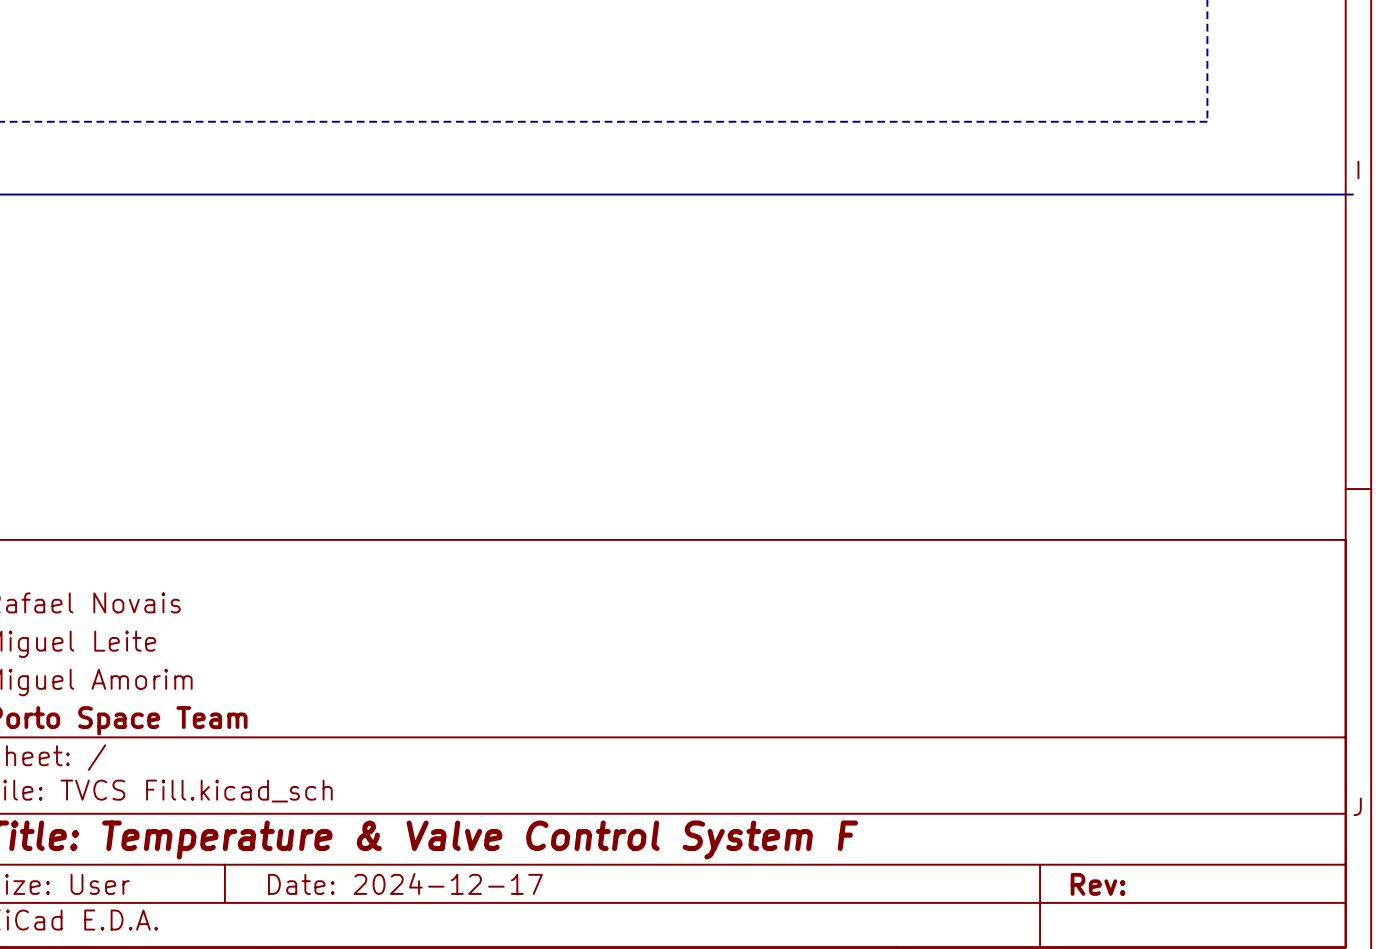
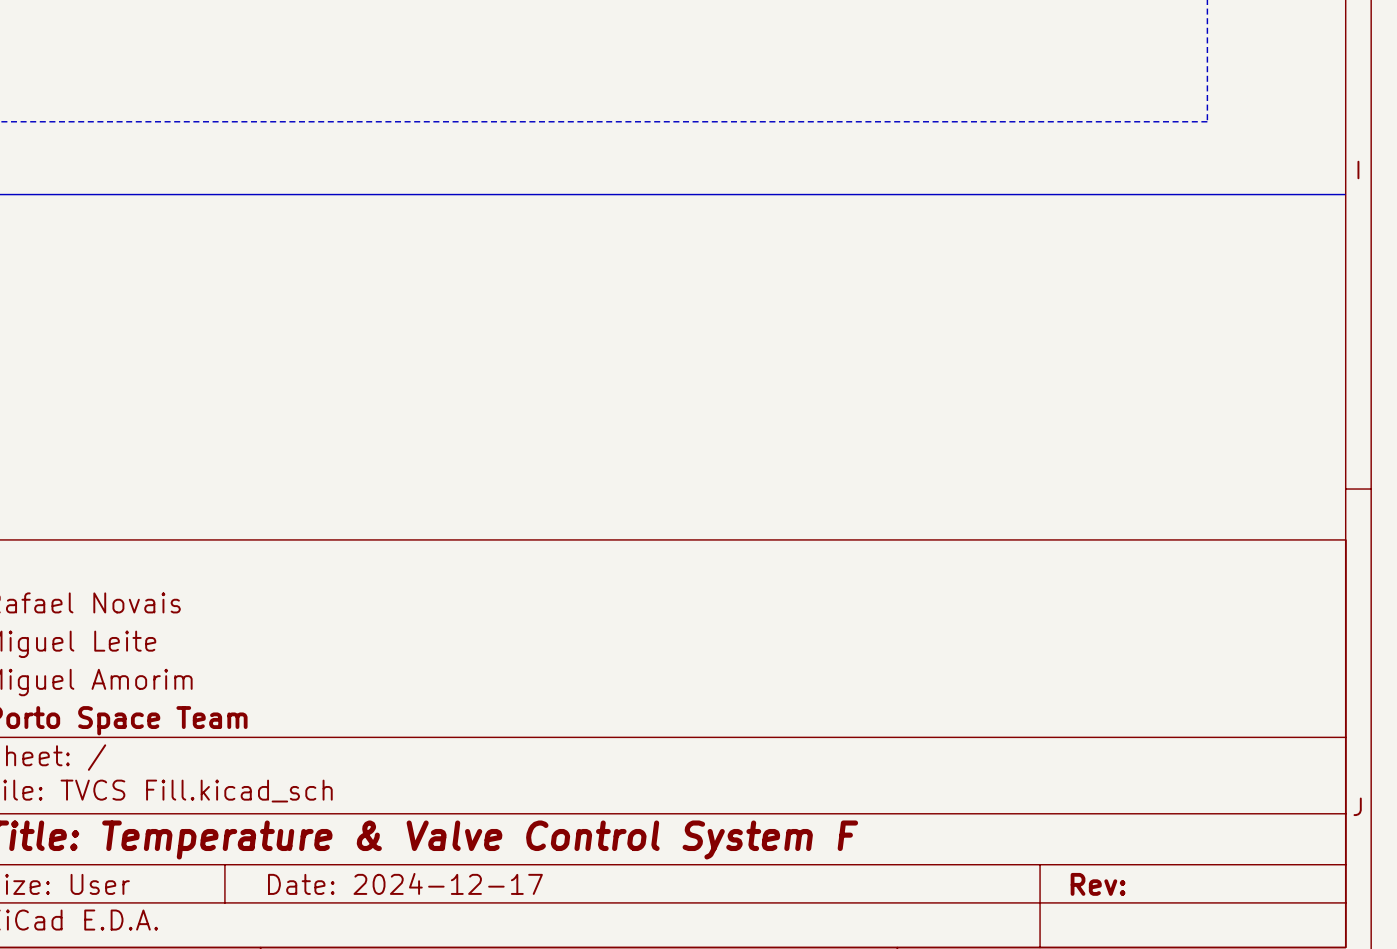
line: (1344, 194) (1352, 194) -> none

